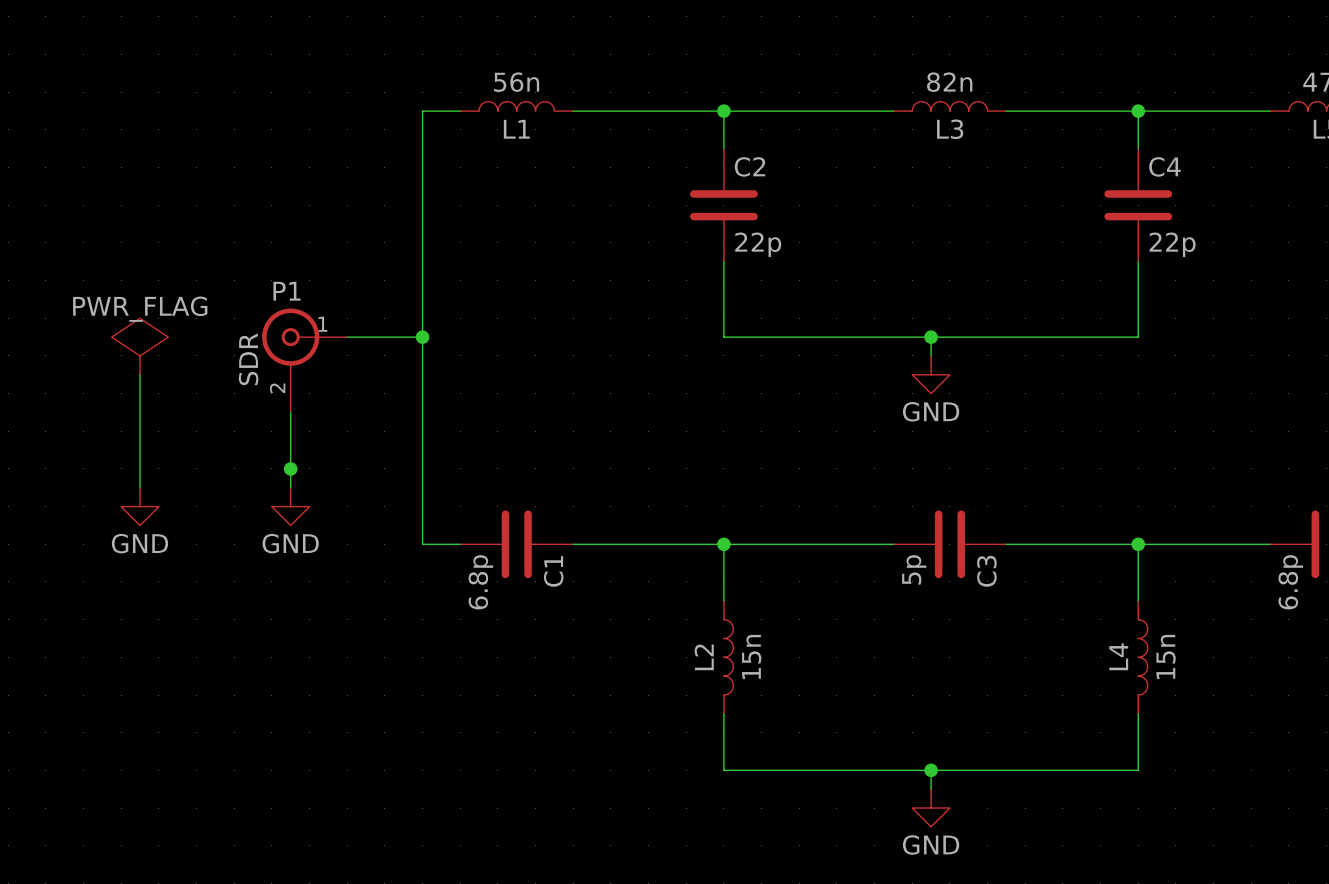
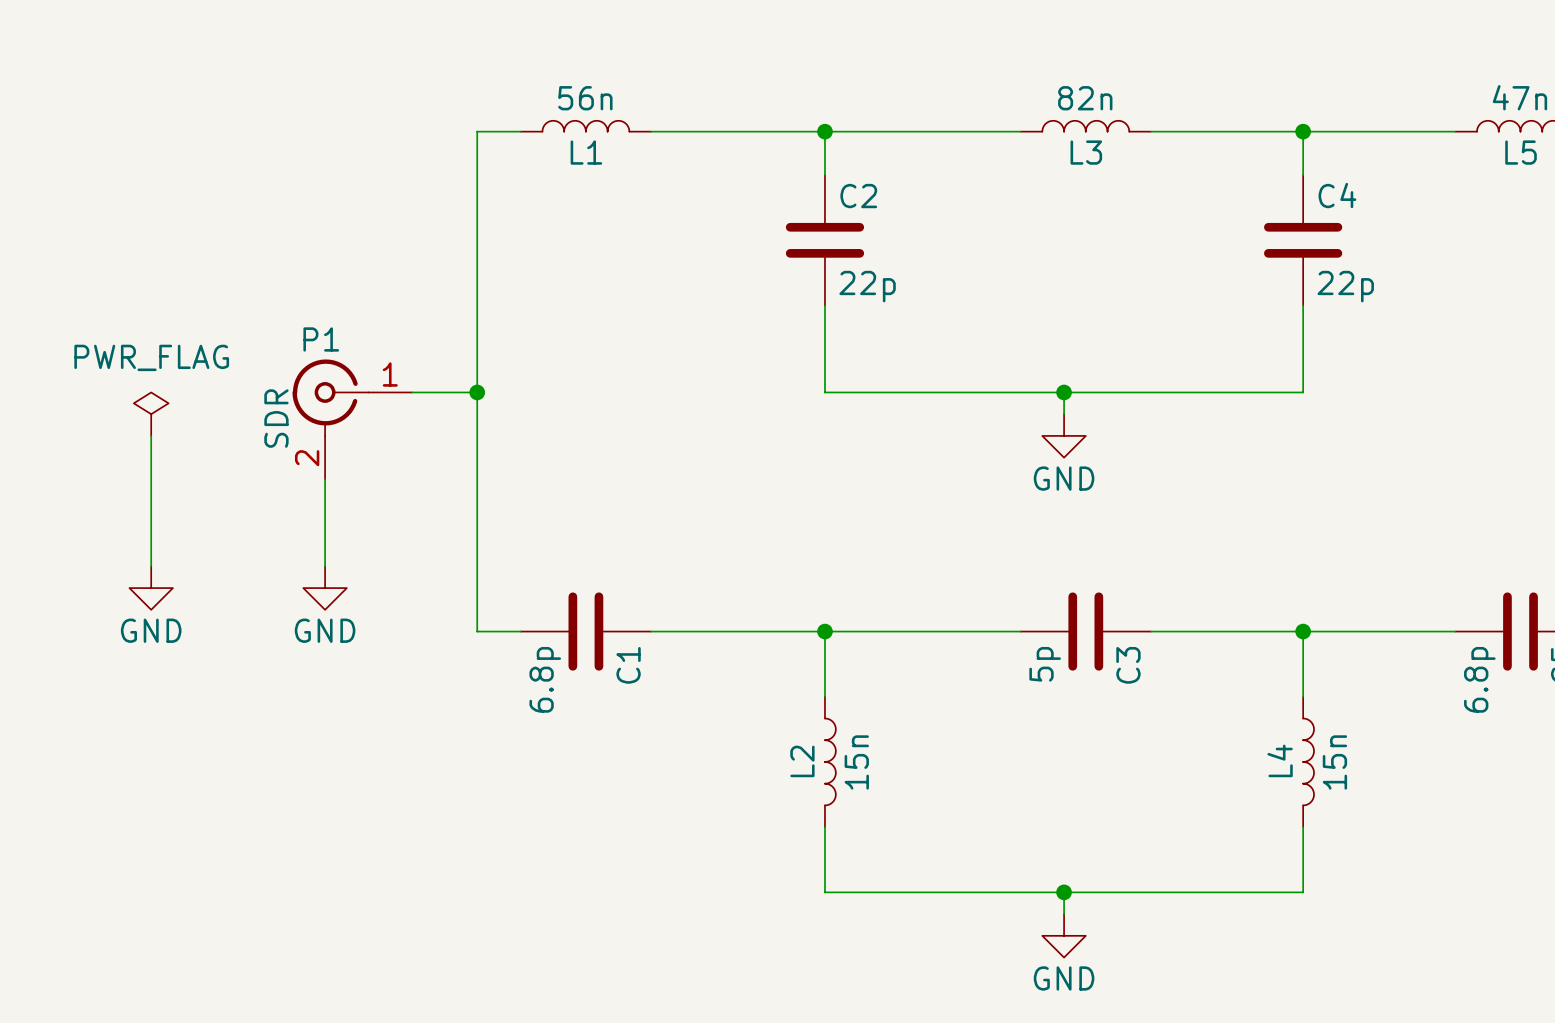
P1 symbol: [262, 308, 348, 413] -> [292, 359, 413, 480]
power symbol shape: [111, 318, 169, 375] -> [133, 392, 169, 436]
junction: (290, 468) -> none

